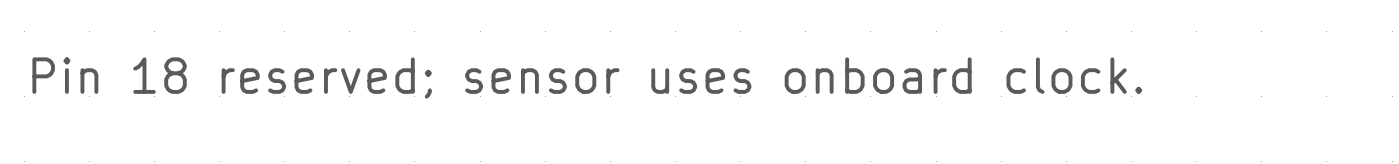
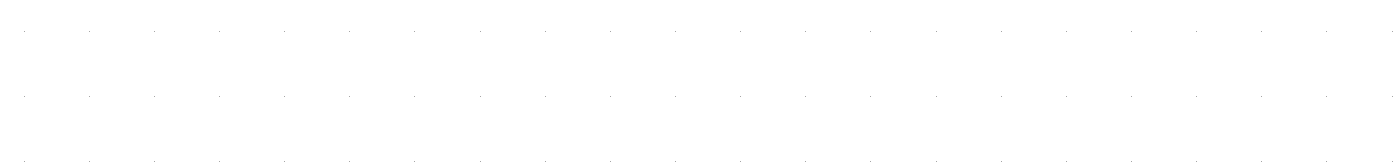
text: Pin 18 reserved; sensor uses onboard clock. (587, 77) -> none

